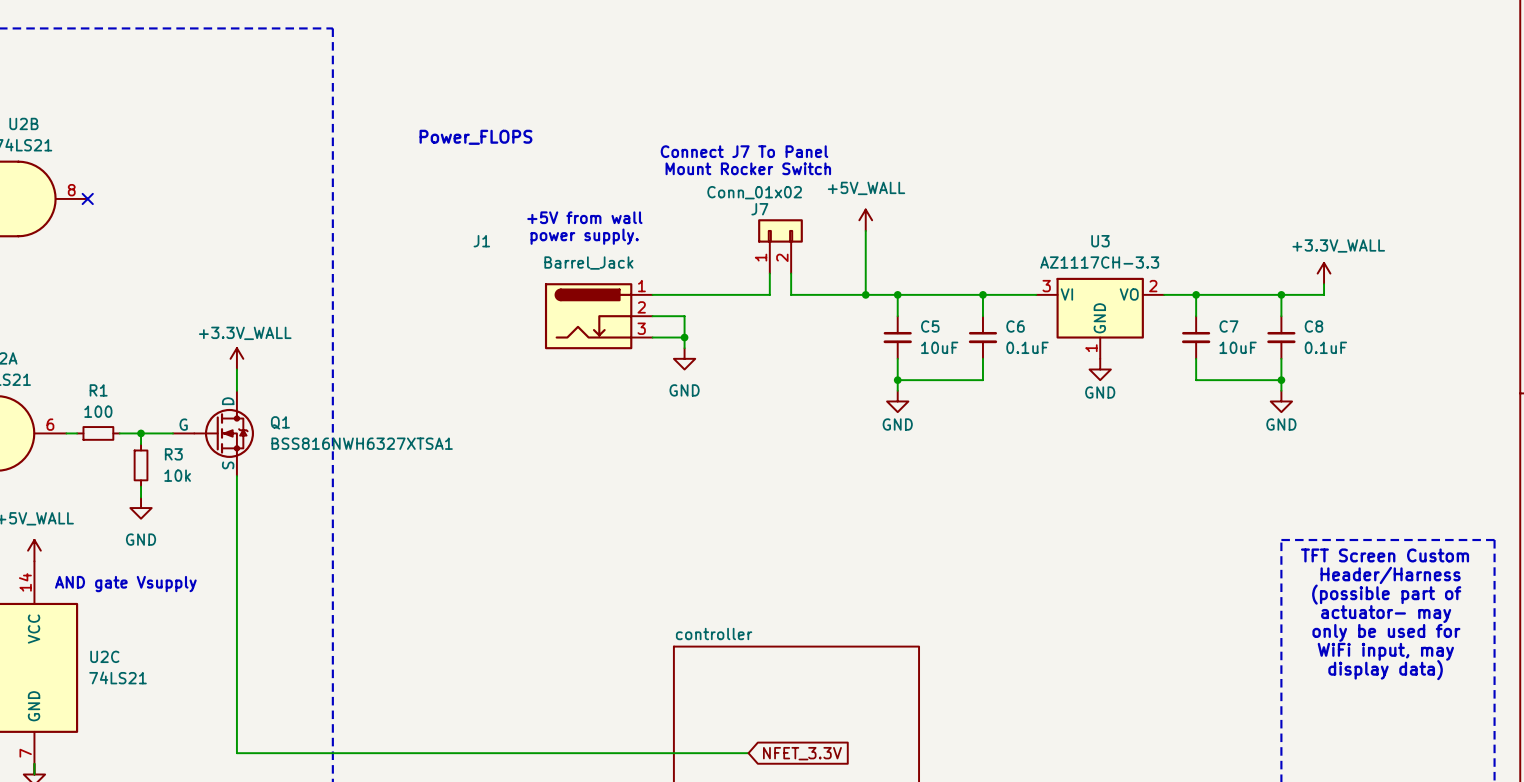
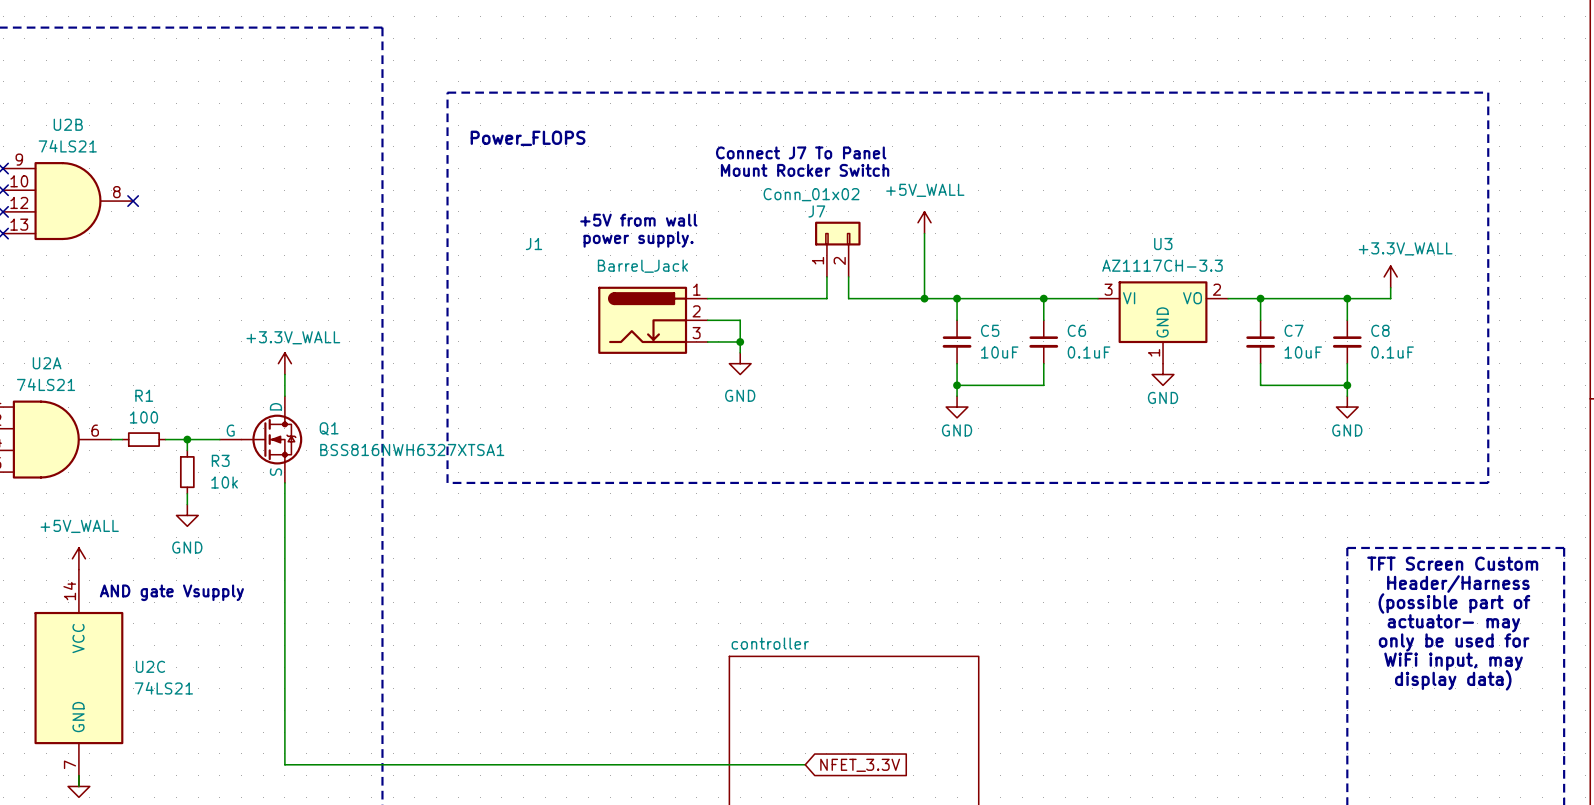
line: none -> (447, 92) (1488, 92) (1488, 482) (447, 482) (447, 92)

